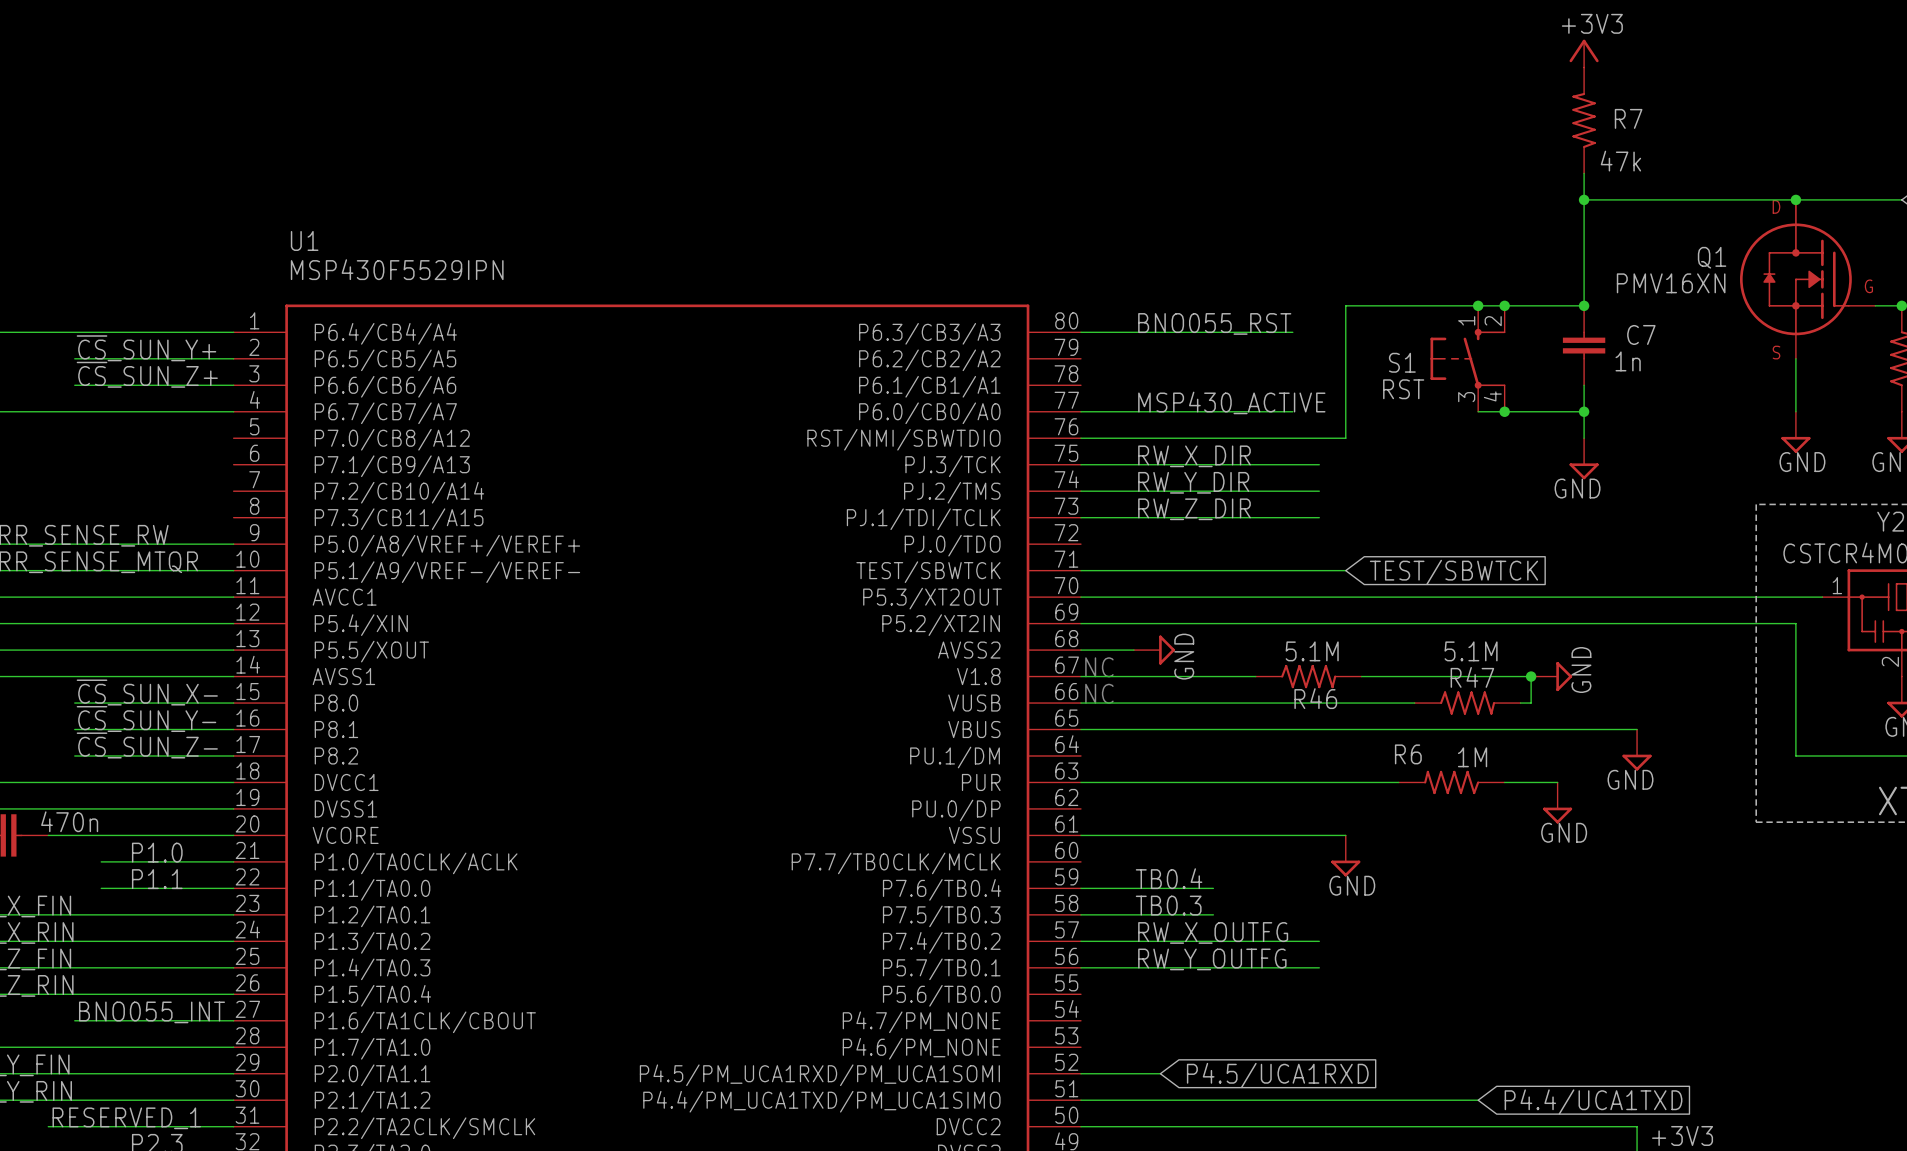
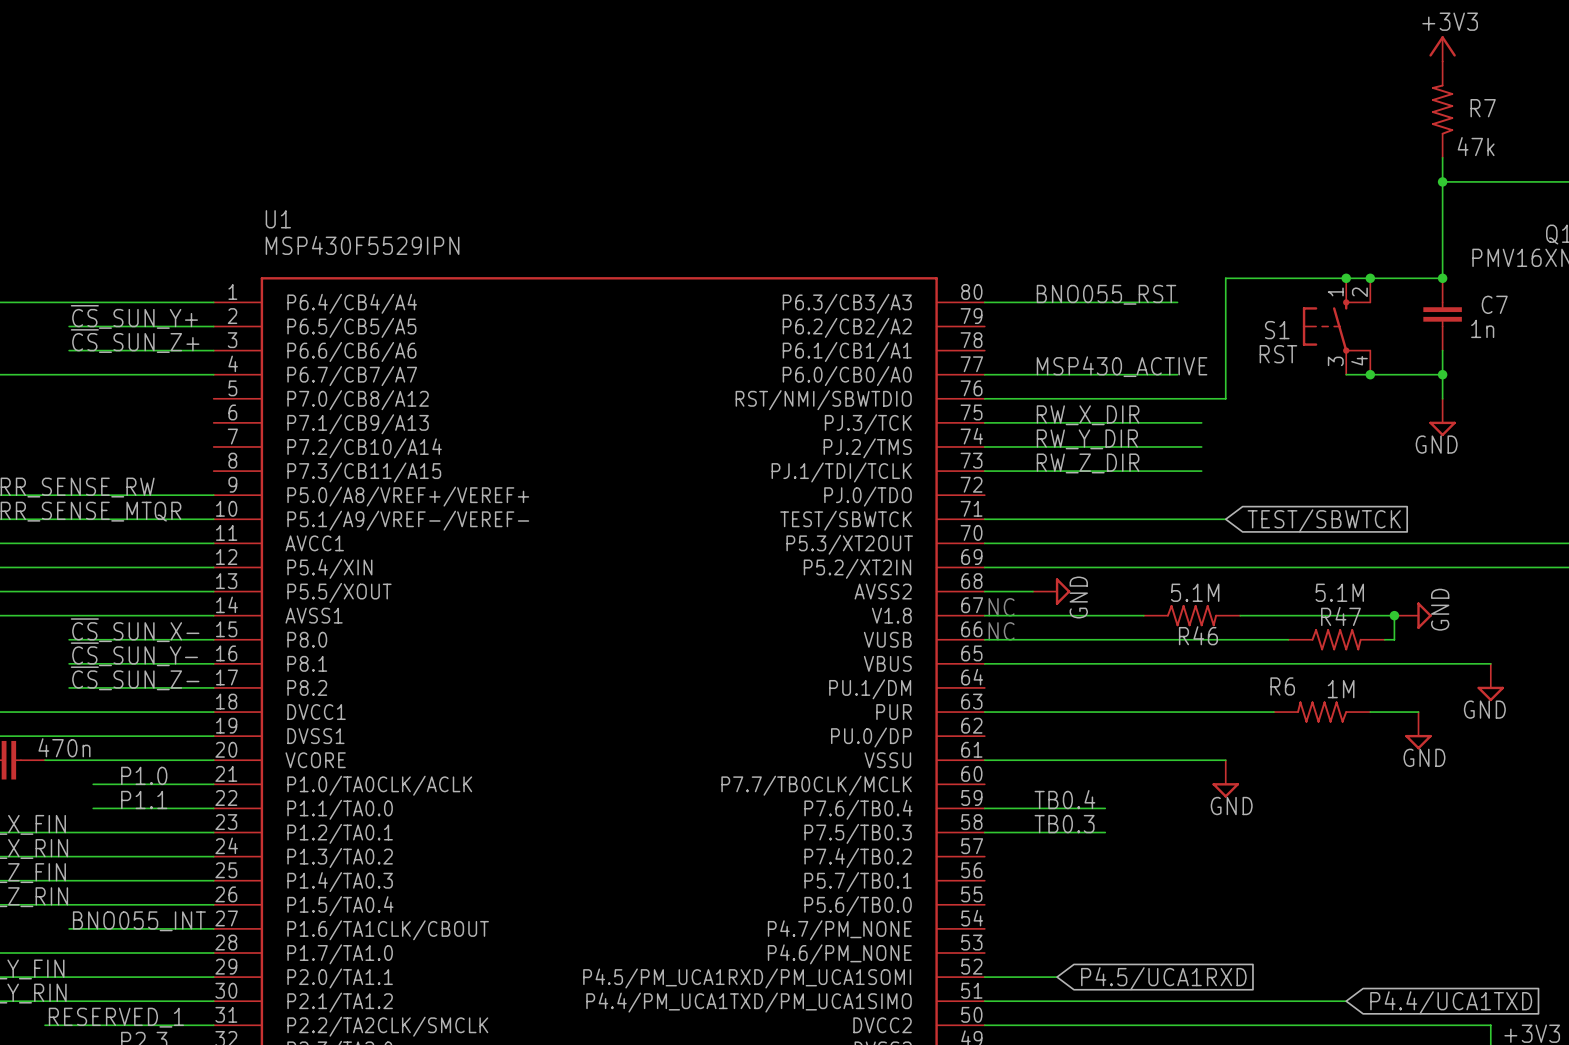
label: RW_X_OUTFG (1213, 932) -> none
wire: (1080, 941) (1319, 941) -> none
label: RW_Y_OUTFG (1212, 959) -> none
wire: (1080, 967) (1319, 967) -> none

